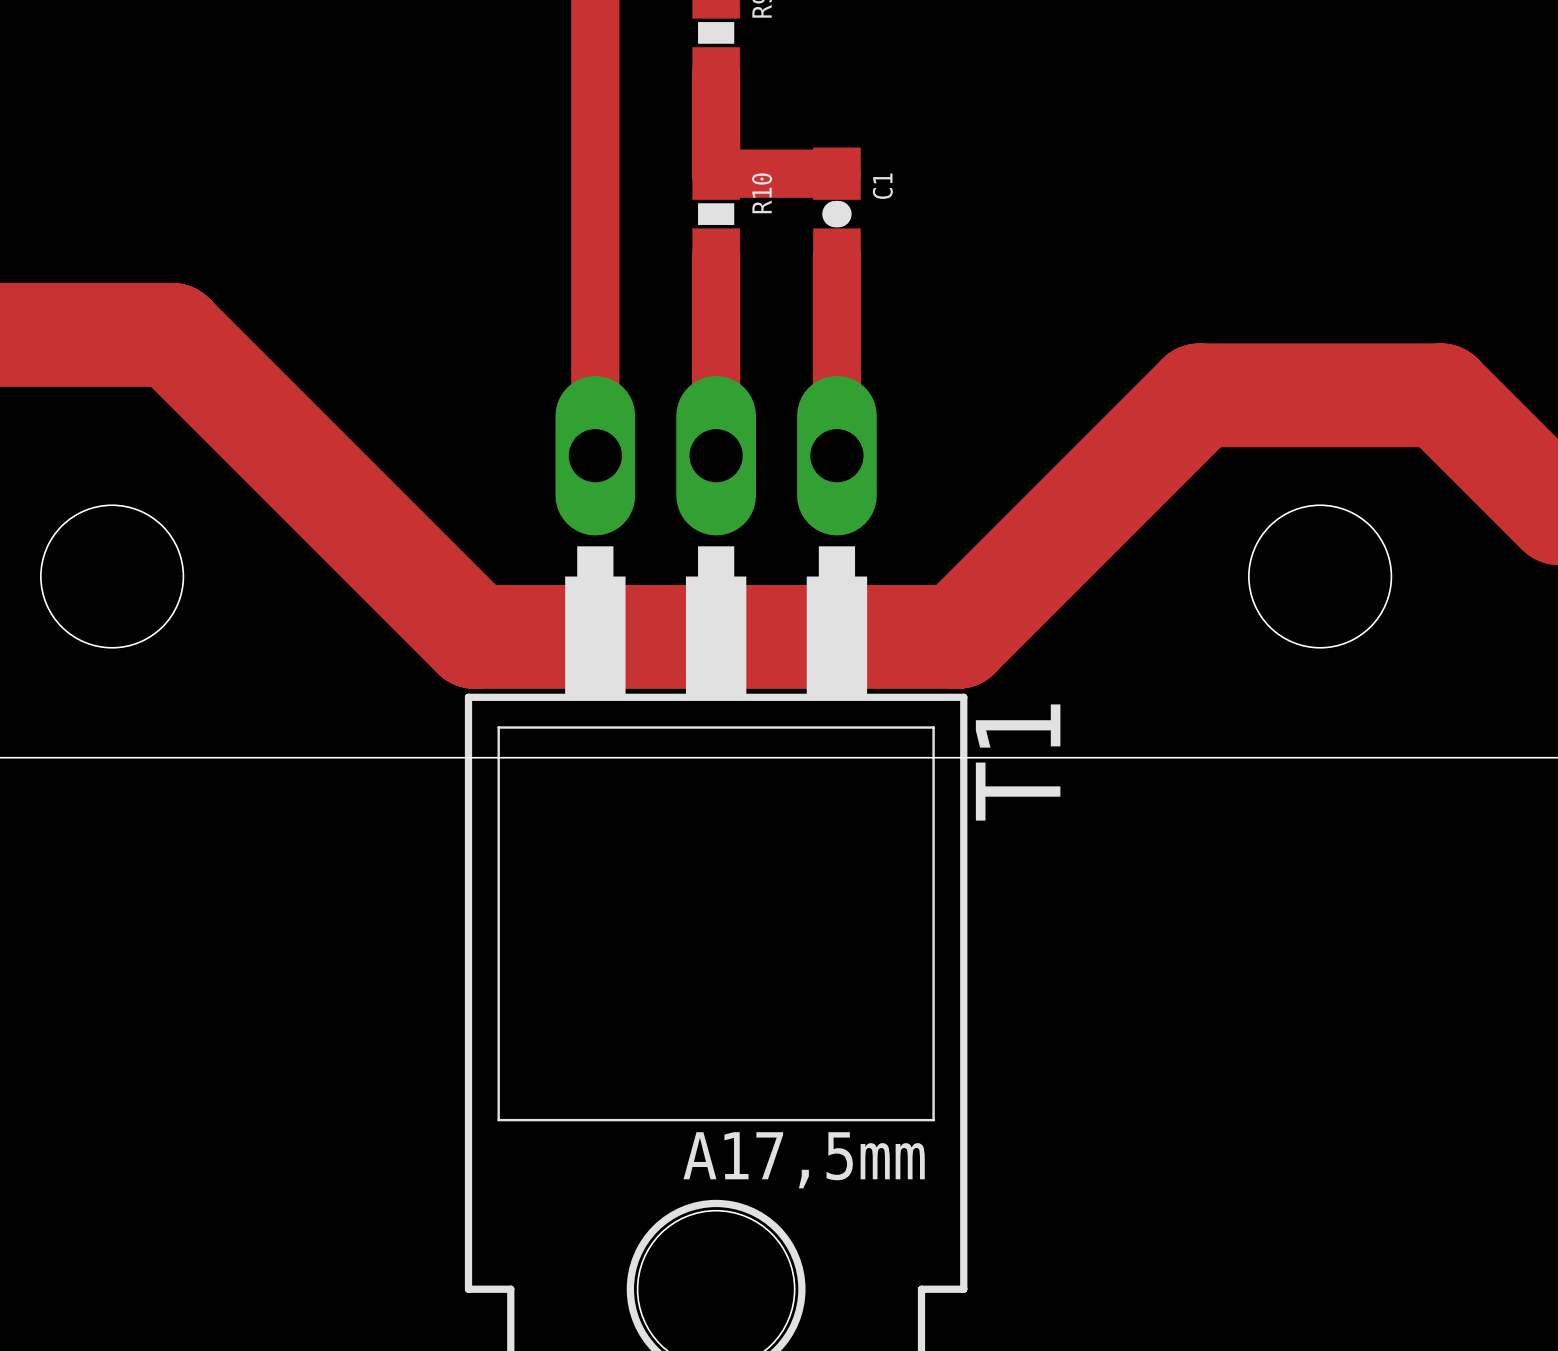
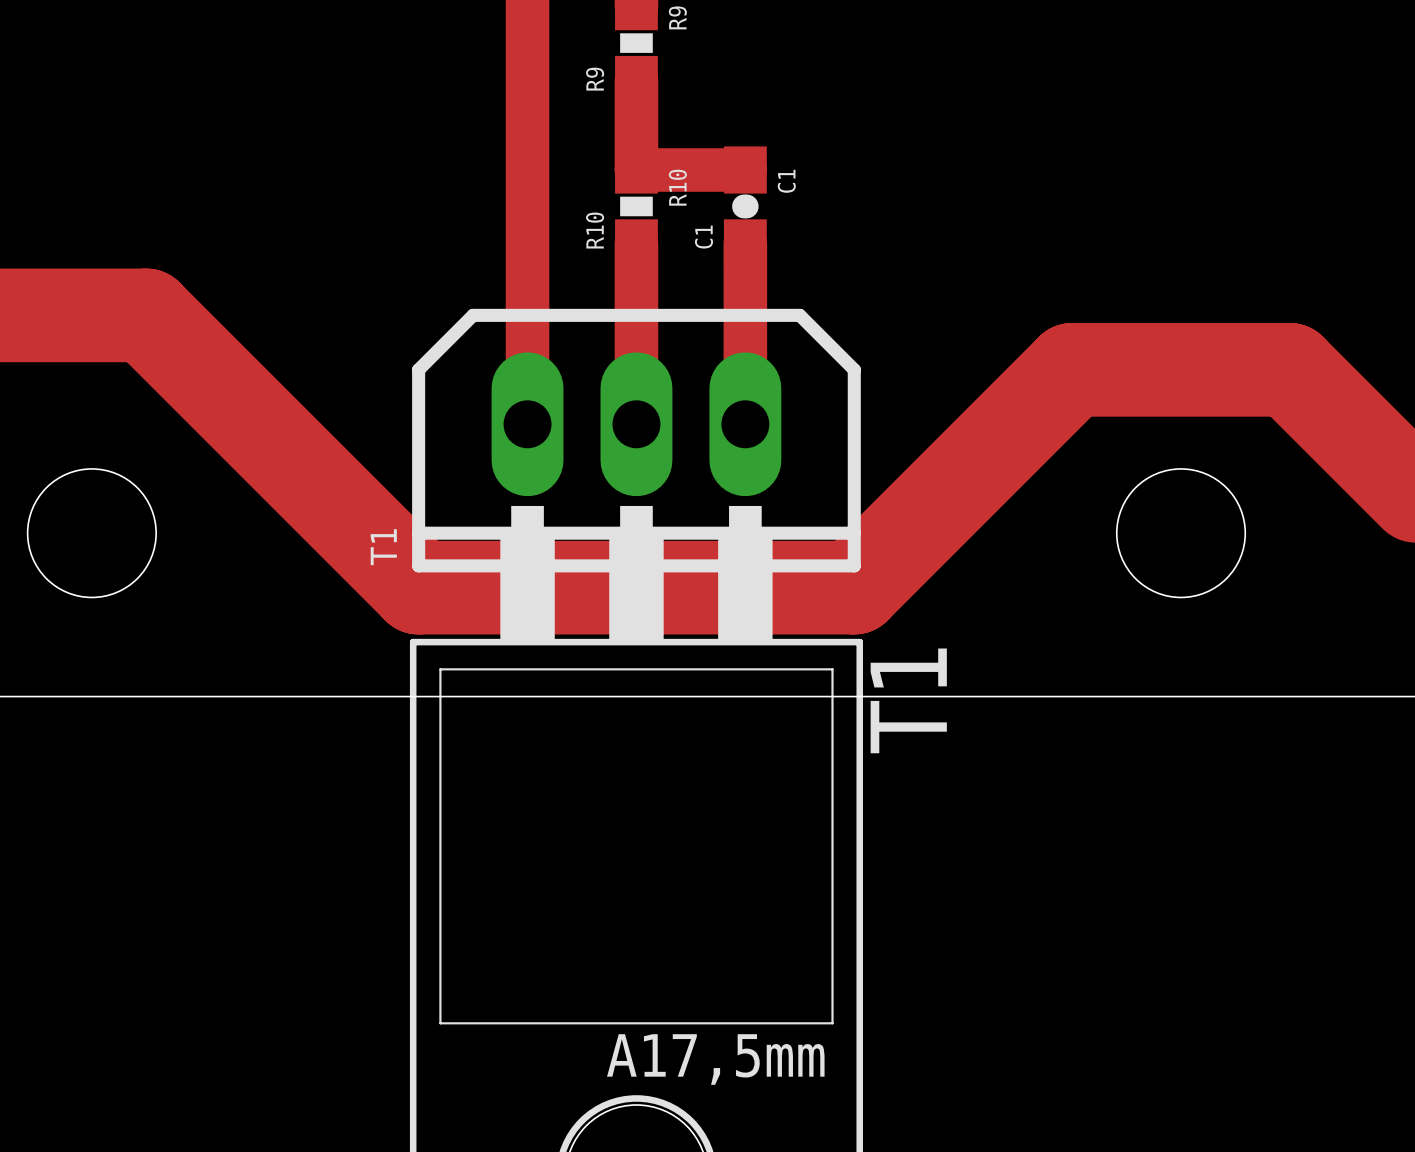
text: none -> R9 (595, 79)
text: none -> R10 (595, 230)
text: none -> C1 (703, 237)
line: none -> (473, 315) (799, 315) (854, 369) (854, 565) (418, 565) (418, 369) (473, 315)
line: none -> (418, 533) (854, 533)
text: none -> T1 (383, 547)

